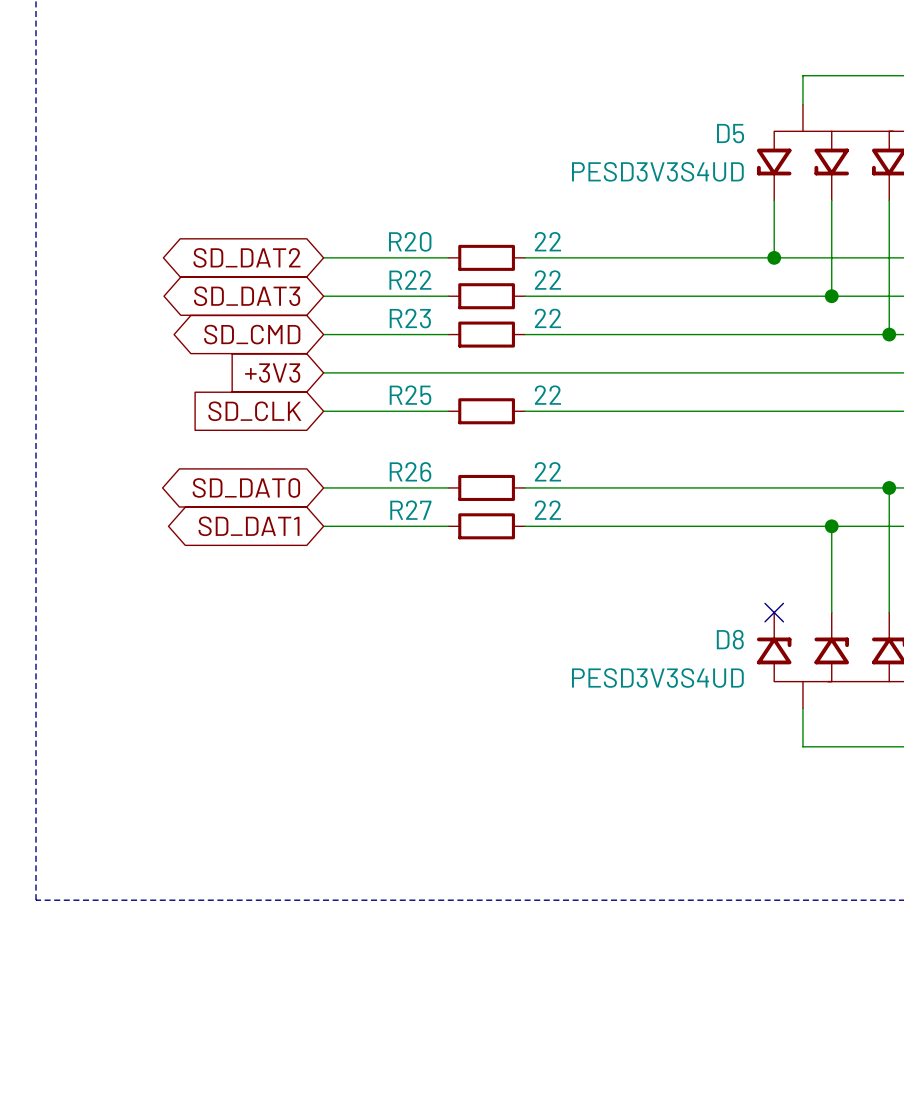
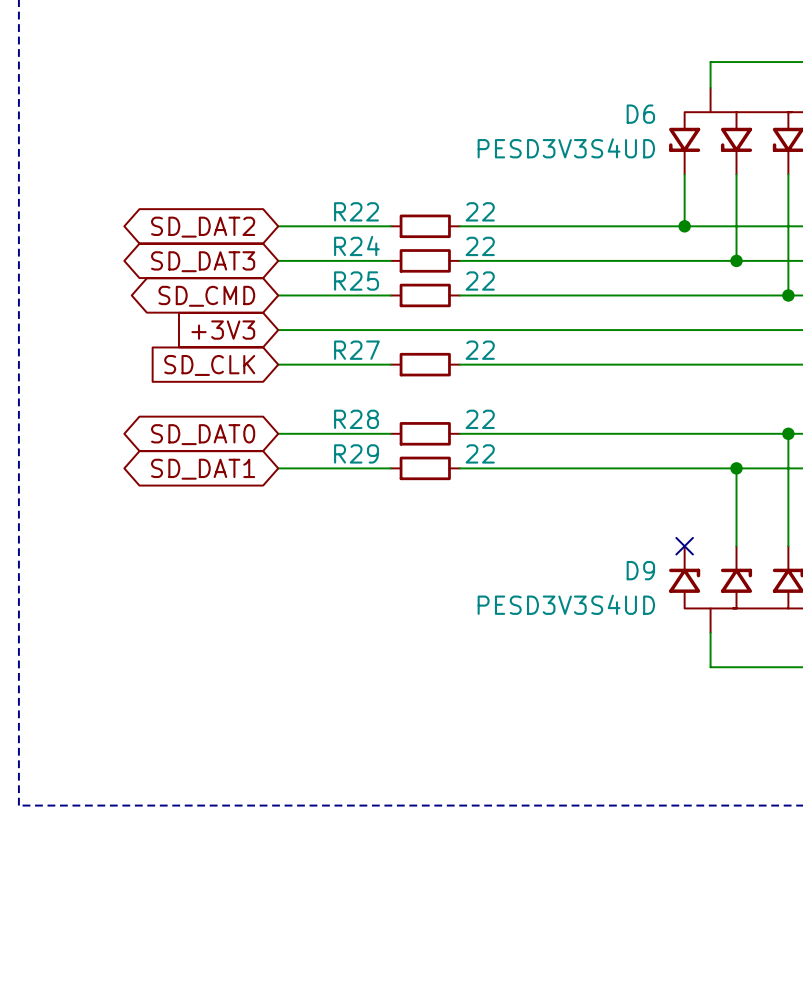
D5 name: D5 (730, 133) -> D6 (640, 114)
R20 name: R20 (410, 241) -> R22 (356, 211)
R22 name: R22 (410, 280) -> R24 (356, 246)
R23 name: R23 (410, 318) -> R25 (356, 281)
R25 name: R25 (410, 395) -> R27 (356, 350)
R26 name: R26 (410, 471) -> R28 (356, 419)
R27 name: R27 (410, 510) -> R29 (356, 453)
D8 name: D8 (730, 639) -> D9 (640, 570)

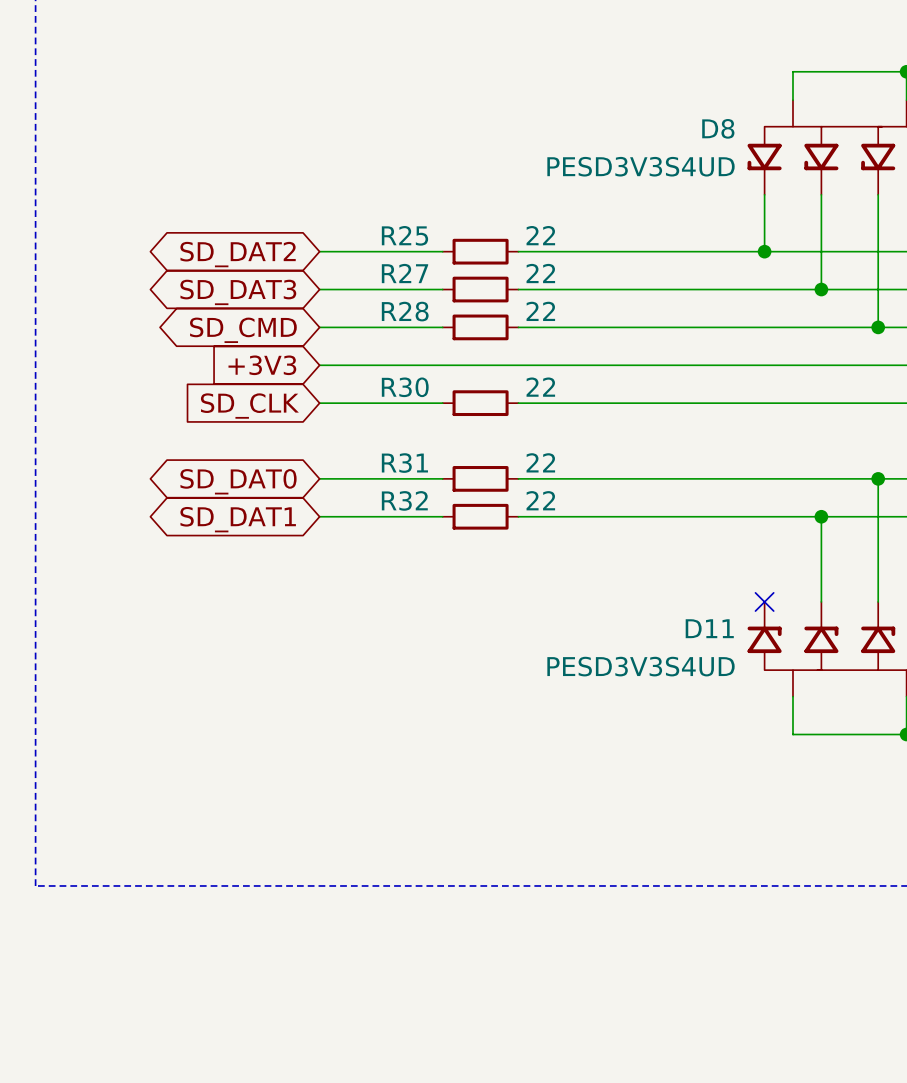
D6 name: D6 (640, 114) -> D8 (718, 128)
R22 name: R22 (356, 211) -> R25 (404, 235)
R24 name: R24 (356, 246) -> R27 (404, 273)
R25 name: R25 (356, 281) -> R28 (405, 311)
R27 name: R27 (356, 350) -> R30 (405, 387)
R28 name: R28 (356, 419) -> R31 (404, 463)
R29 name: R29 (356, 453) -> R32 (404, 500)
D9 name: D9 (640, 570) -> D11 (709, 628)

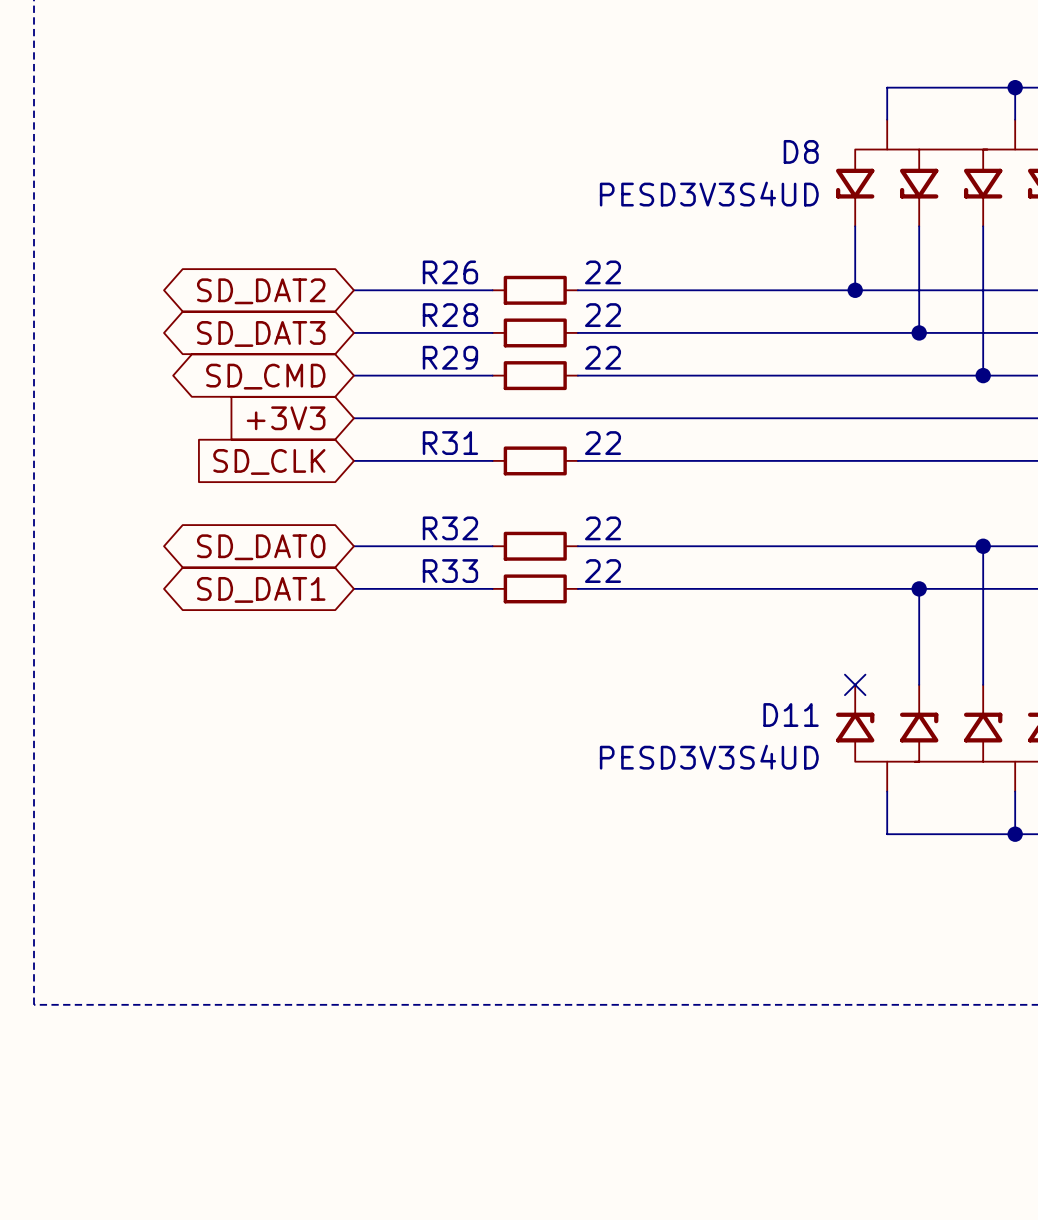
R25 name: R25 (404, 235) -> R26 (450, 272)
R27 name: R27 (404, 273) -> R28 (450, 315)
R28 name: R28 (405, 311) -> R29 (450, 357)
R30 name: R30 (405, 387) -> R31 (450, 443)
R31 name: R31 (404, 463) -> R32 (450, 528)
R32 name: R32 (404, 500) -> R33 (450, 571)

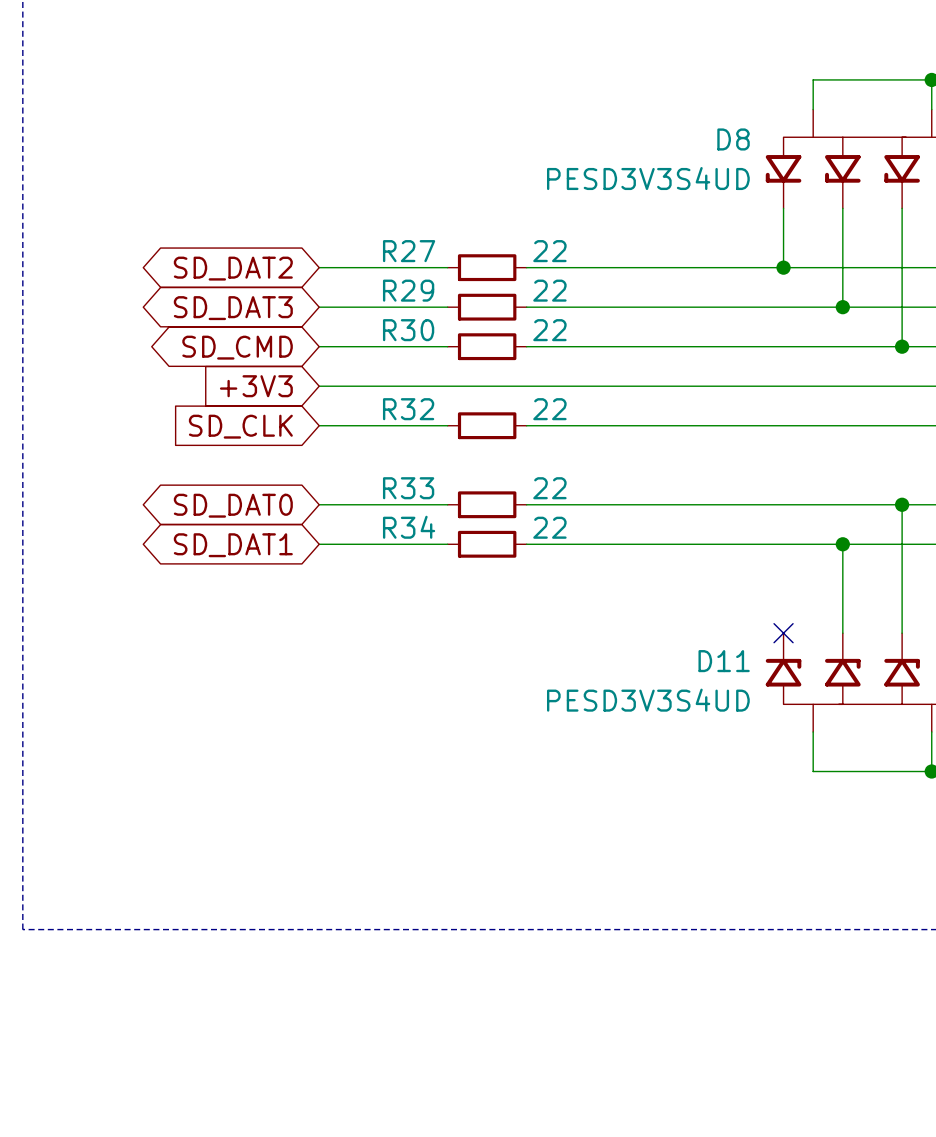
R26 name: R26 (450, 272) -> R27 (409, 251)
R28 name: R28 (450, 315) -> R29 (408, 290)
R29 name: R29 (450, 357) -> R30 (408, 330)
R31 name: R31 (450, 443) -> R32 (408, 409)
R32 name: R32 (450, 528) -> R33 (408, 488)
R33 name: R33 (450, 571) -> R34 (409, 527)

